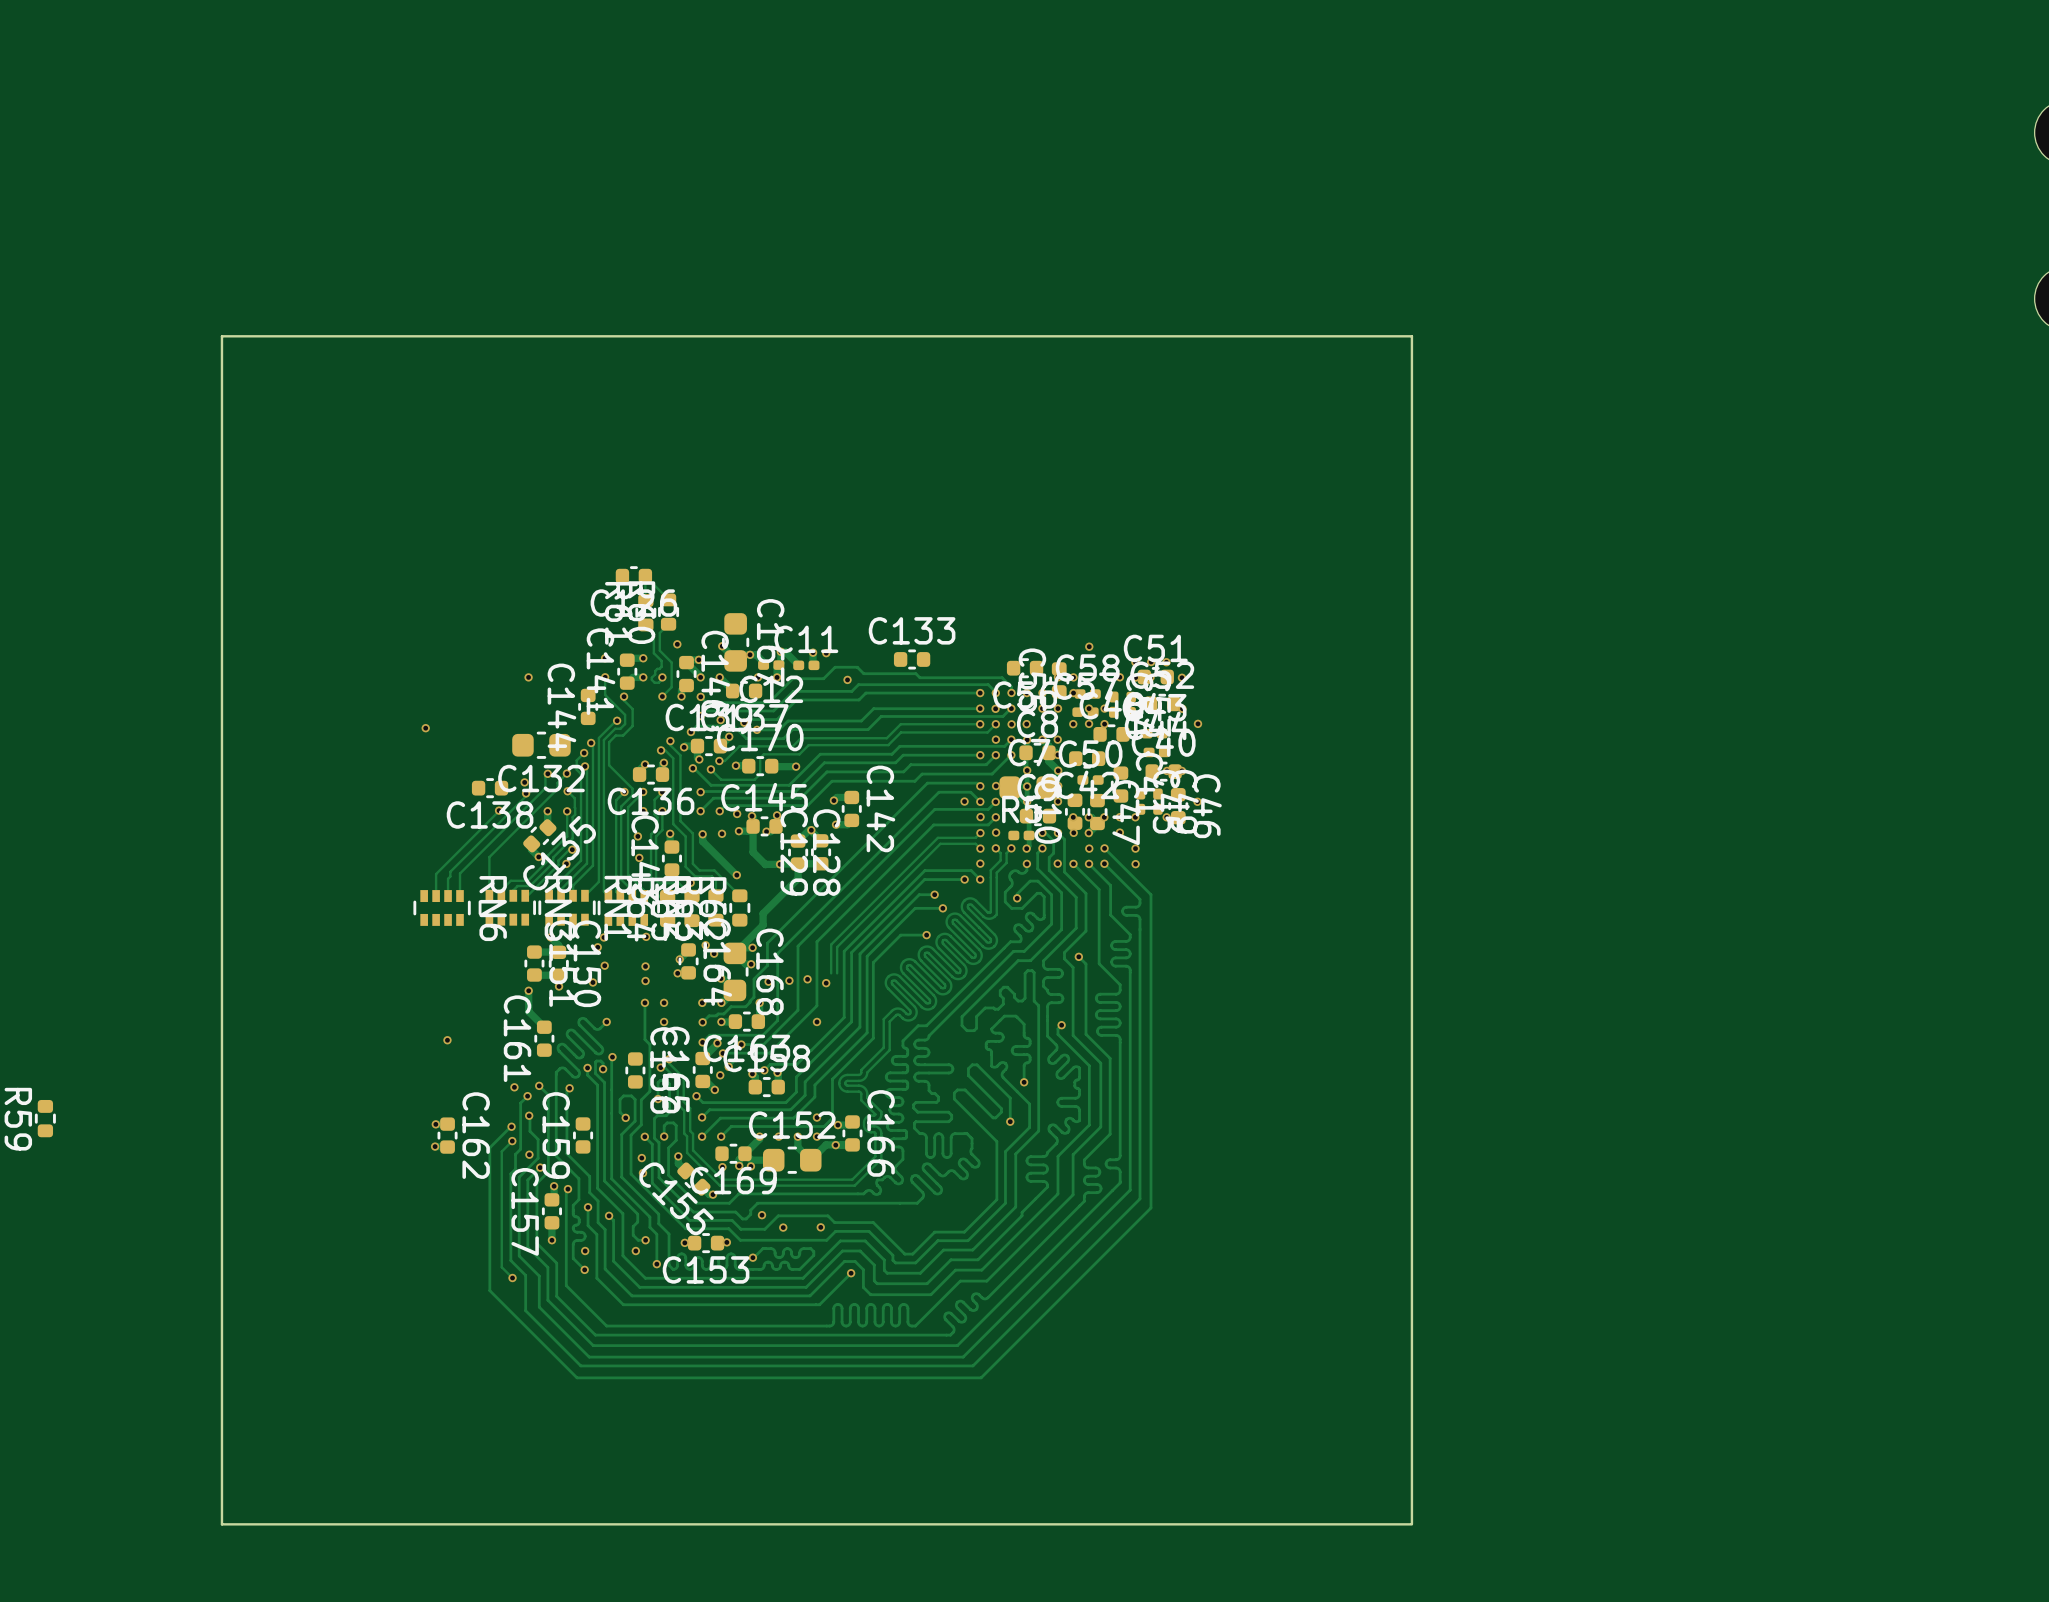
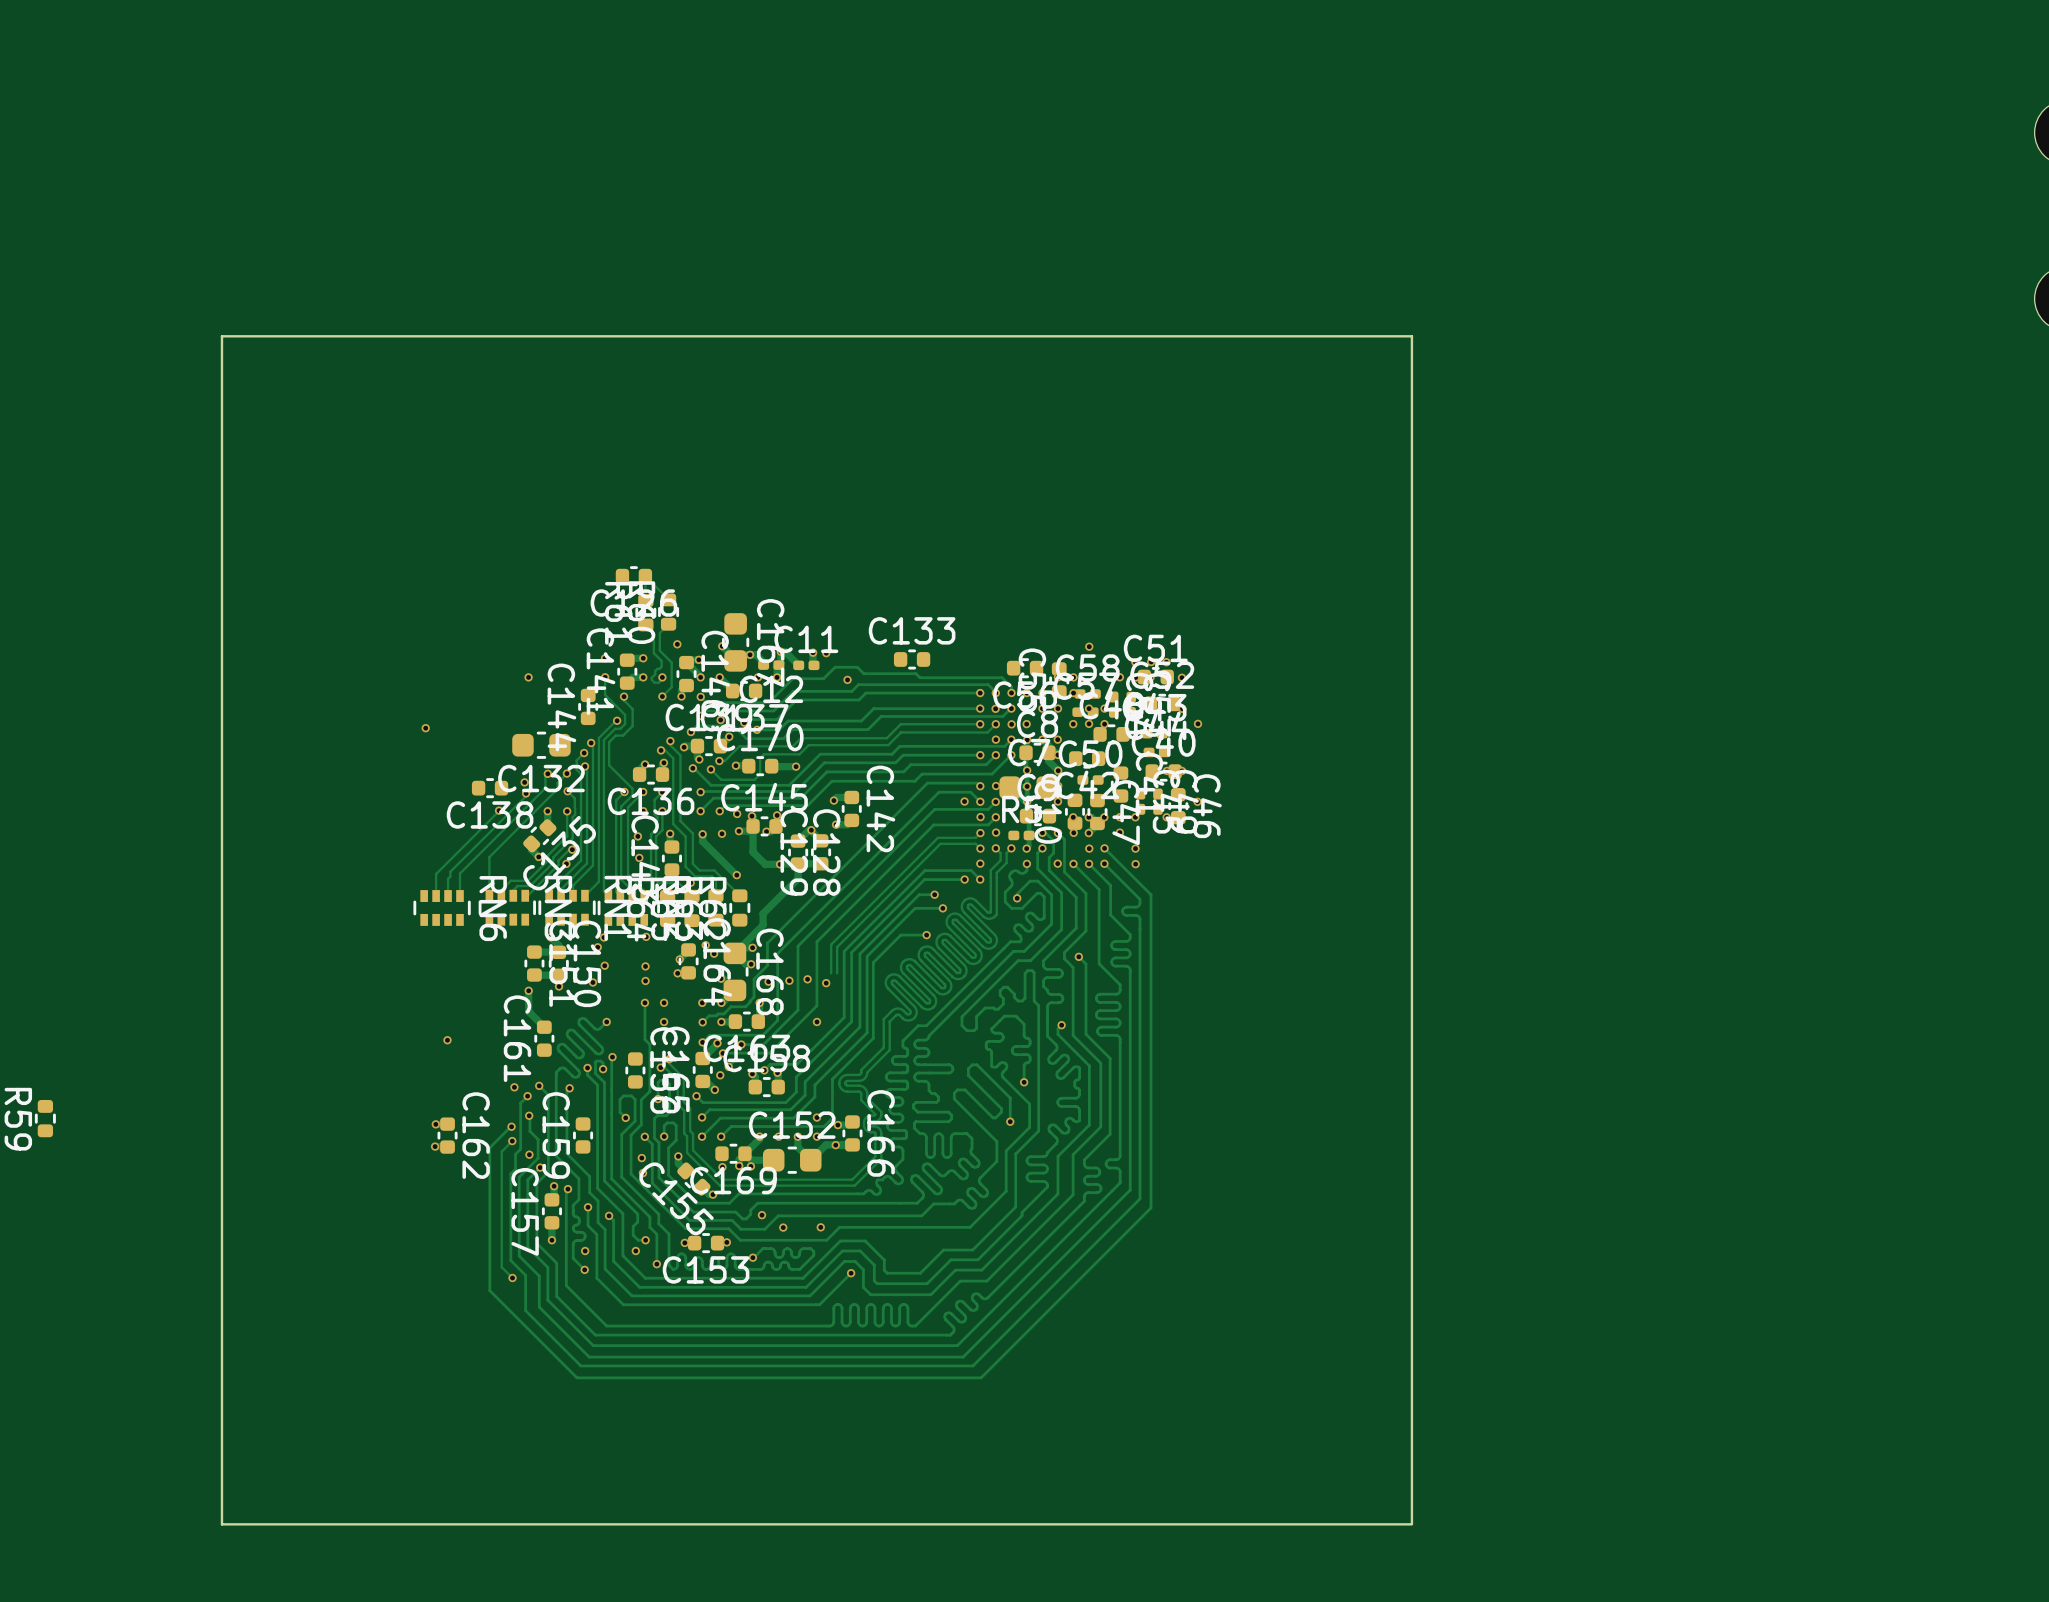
track: (1006, 1150) (1005, 1203) (967, 1240) (937, 1240) (915, 1262) (895, 1262) (892, 1260) (892, 1255) (869, 1231) (835, 1231) -> (1006, 1150) (1006, 1191) (970, 1227) (839, 1227) (835, 1231)
track: (996, 1161) (996, 1199) (964, 1232) (934, 1232) (912, 1254) (904, 1254) (873, 1222) (834, 1222) (827, 1215) -> (996, 1161) (979, 1179) (979, 1182) (987, 1190) (986, 1195) (981, 1196) (972, 1188) (967, 1190) (968, 1194) (975, 1203) (973, 1208) (969, 1207) (960, 1199) (954, 1203) (933, 1203) (921, 1215) (827, 1215)

